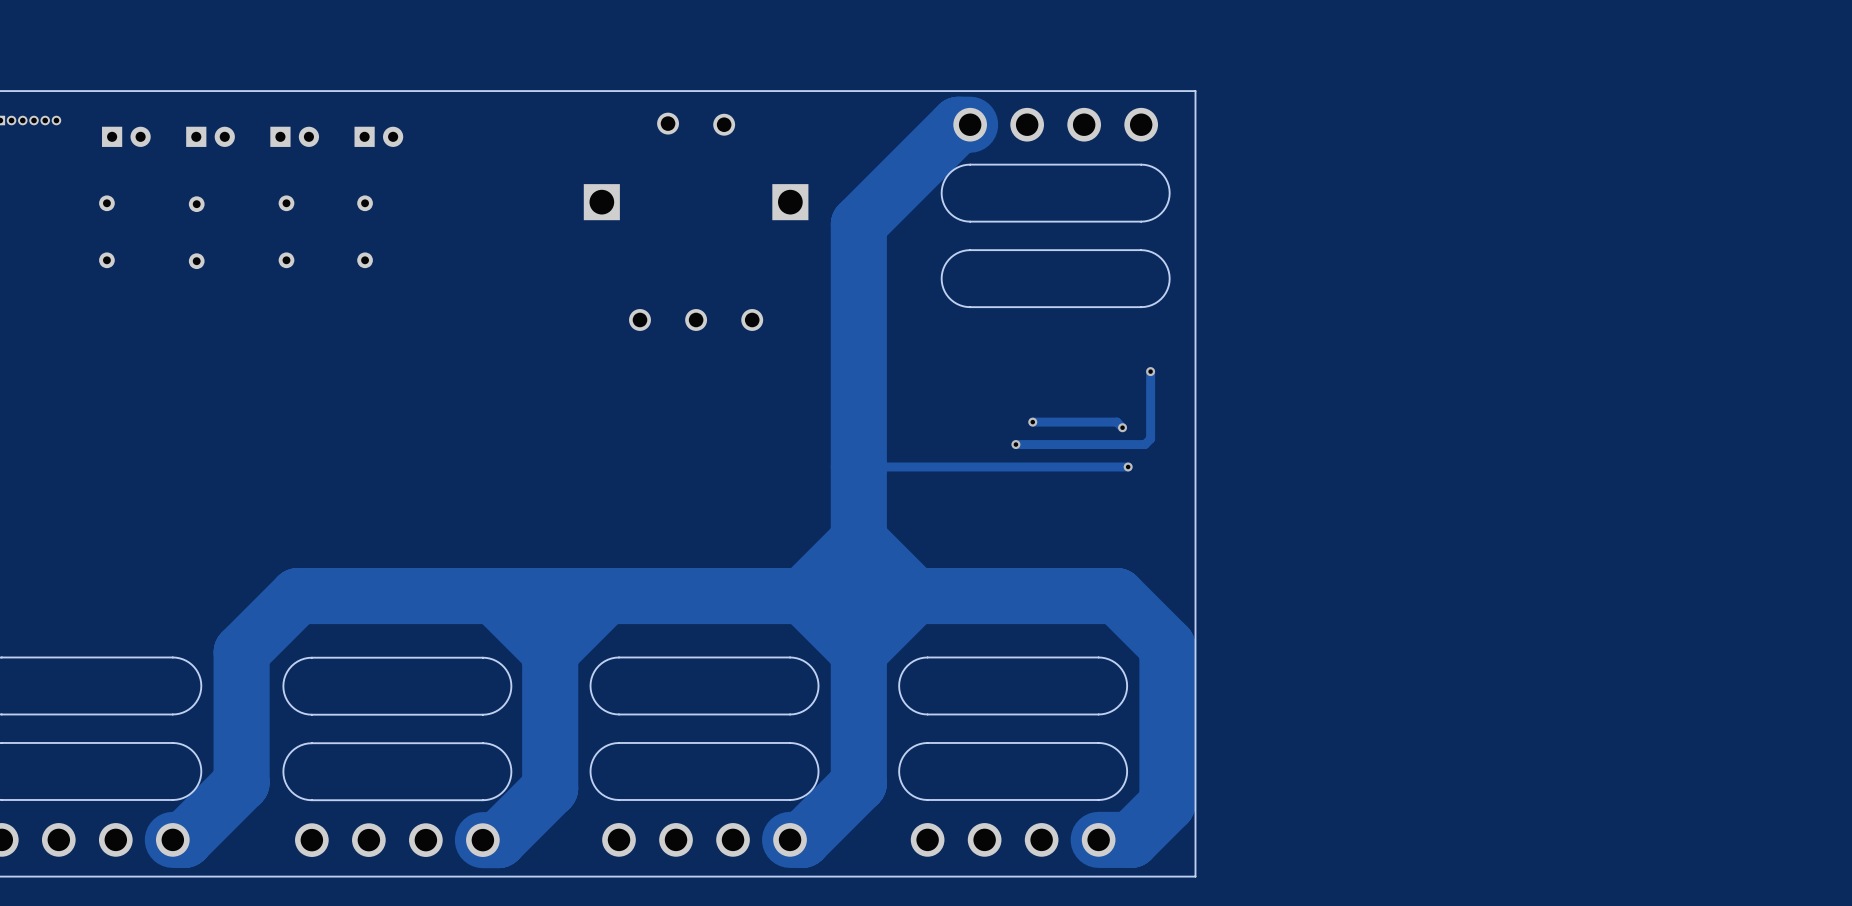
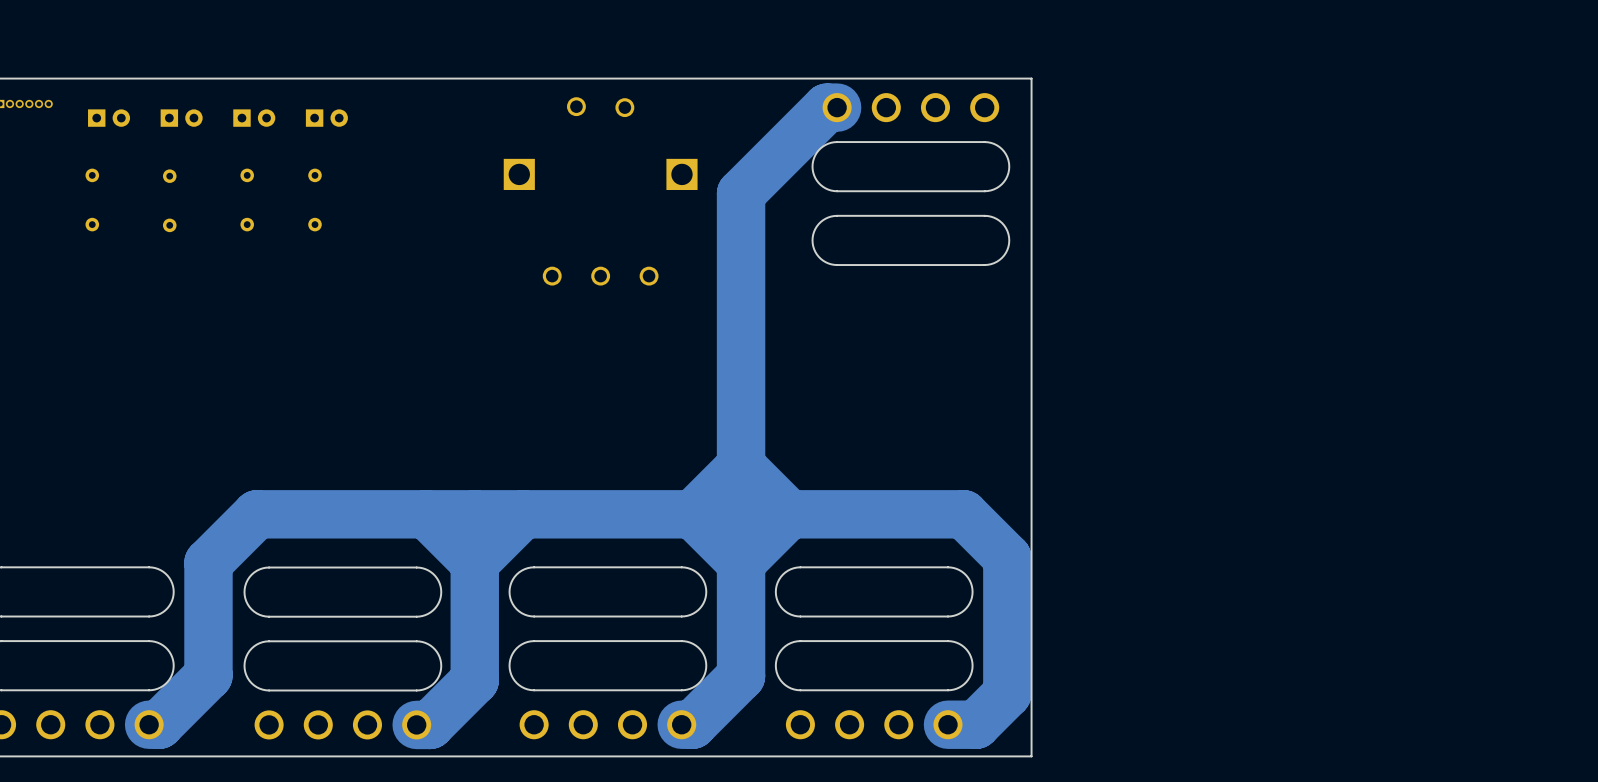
track: (1150, 371) (1150, 438) (1144, 444) (1015, 444) -> none
via: (1150, 371) -> none
track: (1032, 422) (1116, 422) (1122, 427) -> none
via: (1032, 422) -> none
via: (1122, 427) -> none
via: (1015, 444) -> none
track: (1128, 466) (858, 466) -> none
via: (1128, 466) -> none

